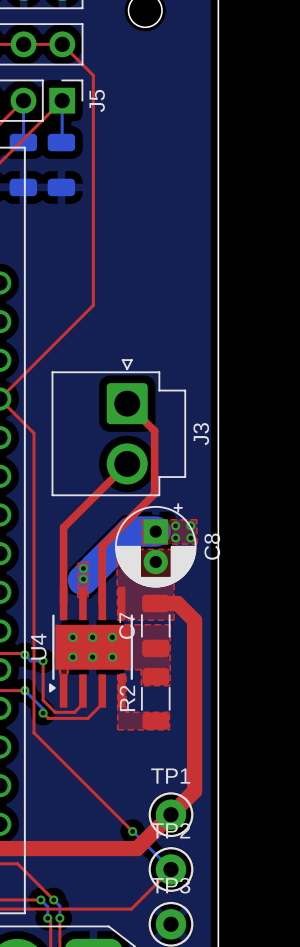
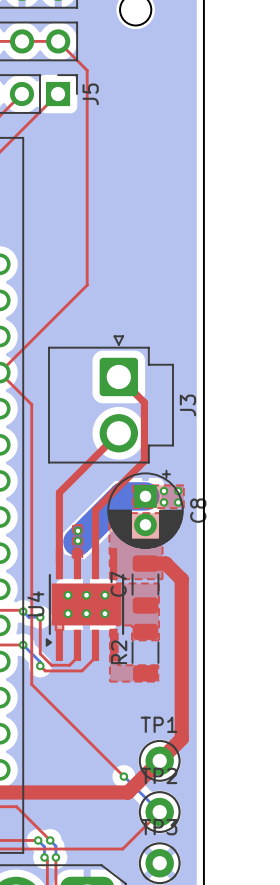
bottom track: (23, 100) (23, 142) -> none
bottom track: (62, 100) (62, 142) -> none
part: (23, 165) -> none
part: (61, 165) -> none

